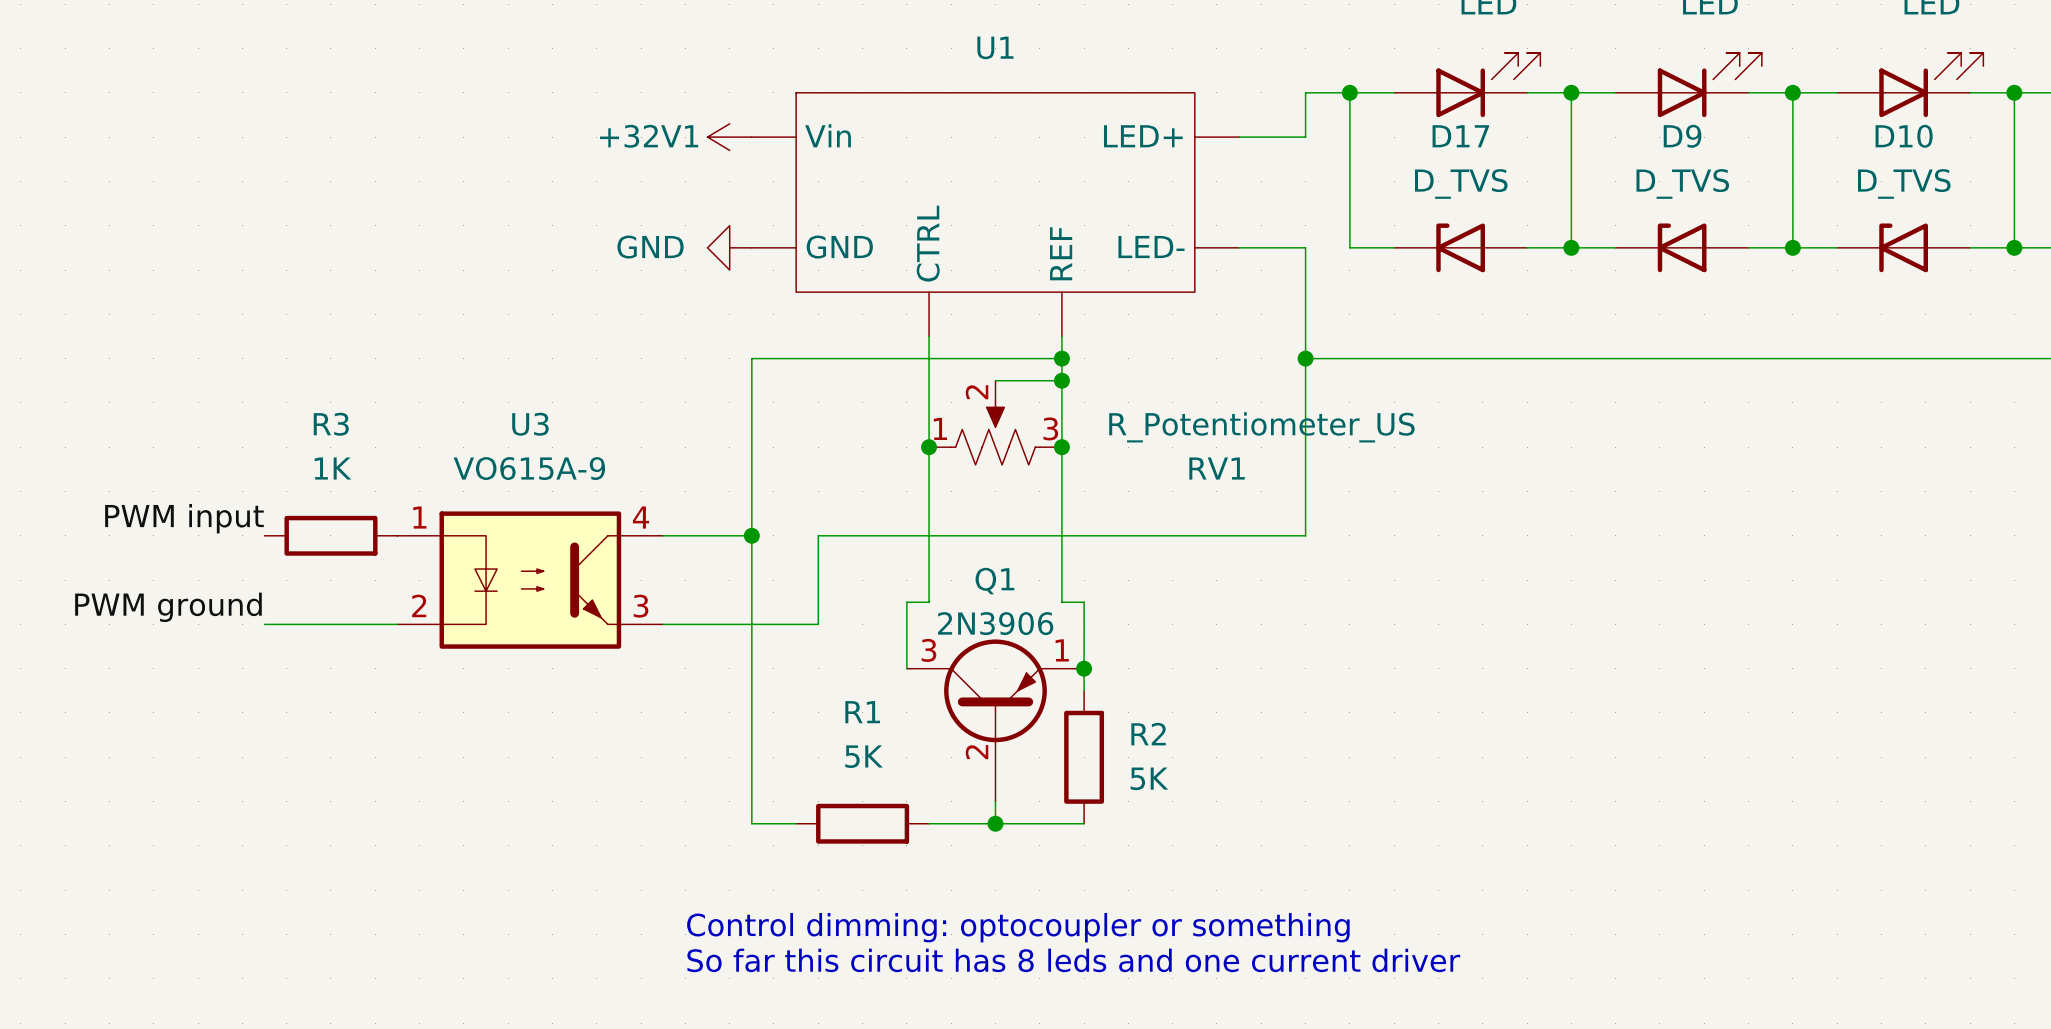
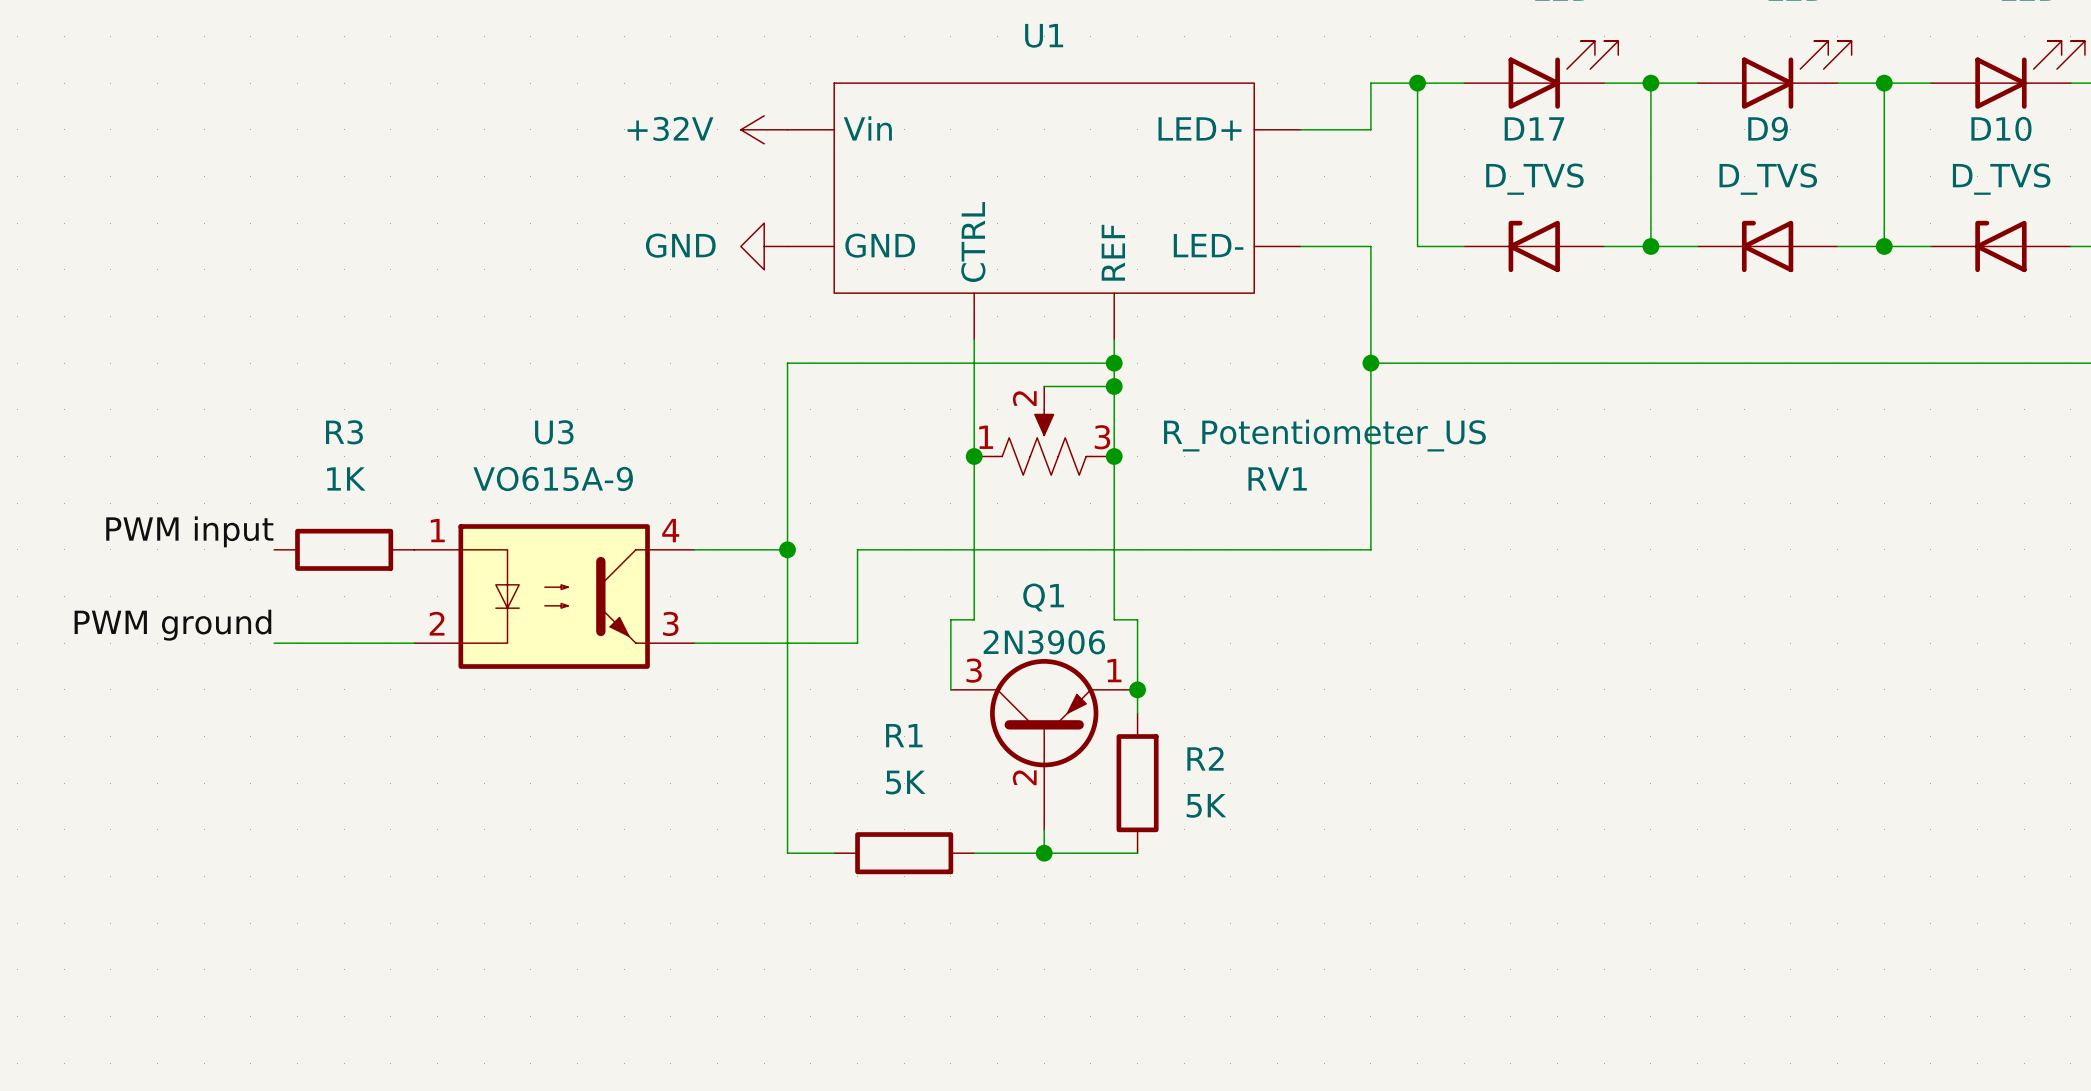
+32V1 name: +32V1 (649, 136) -> +32V (670, 128)
text: Control dimming: optocoupler or something (1018, 927) -> none
text: So far this circuit has 8 leds and one current driver (1073, 960) -> none

